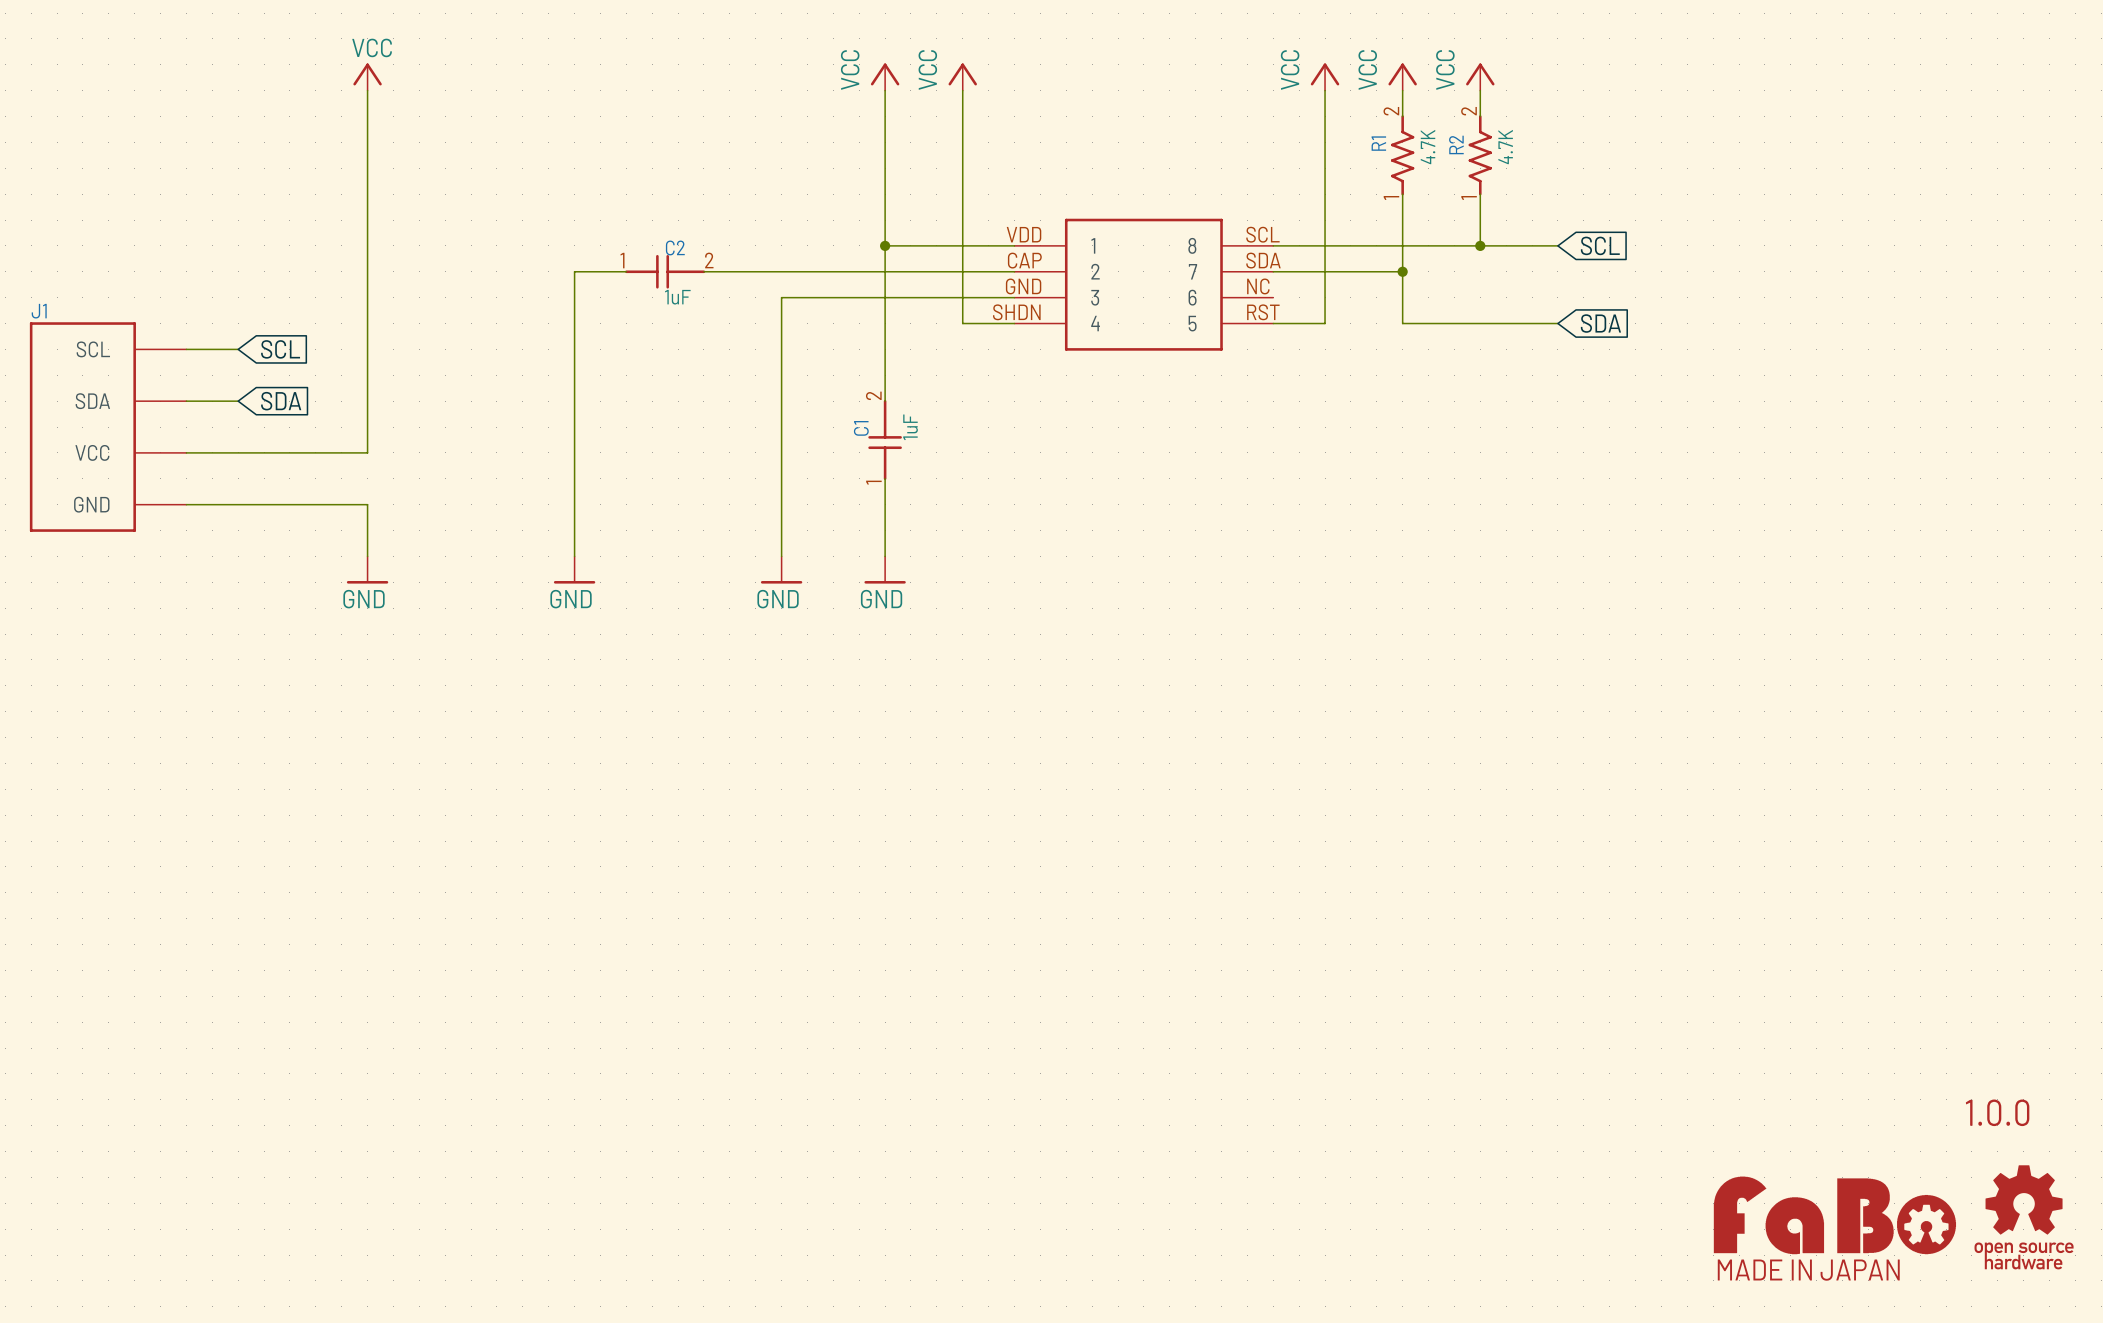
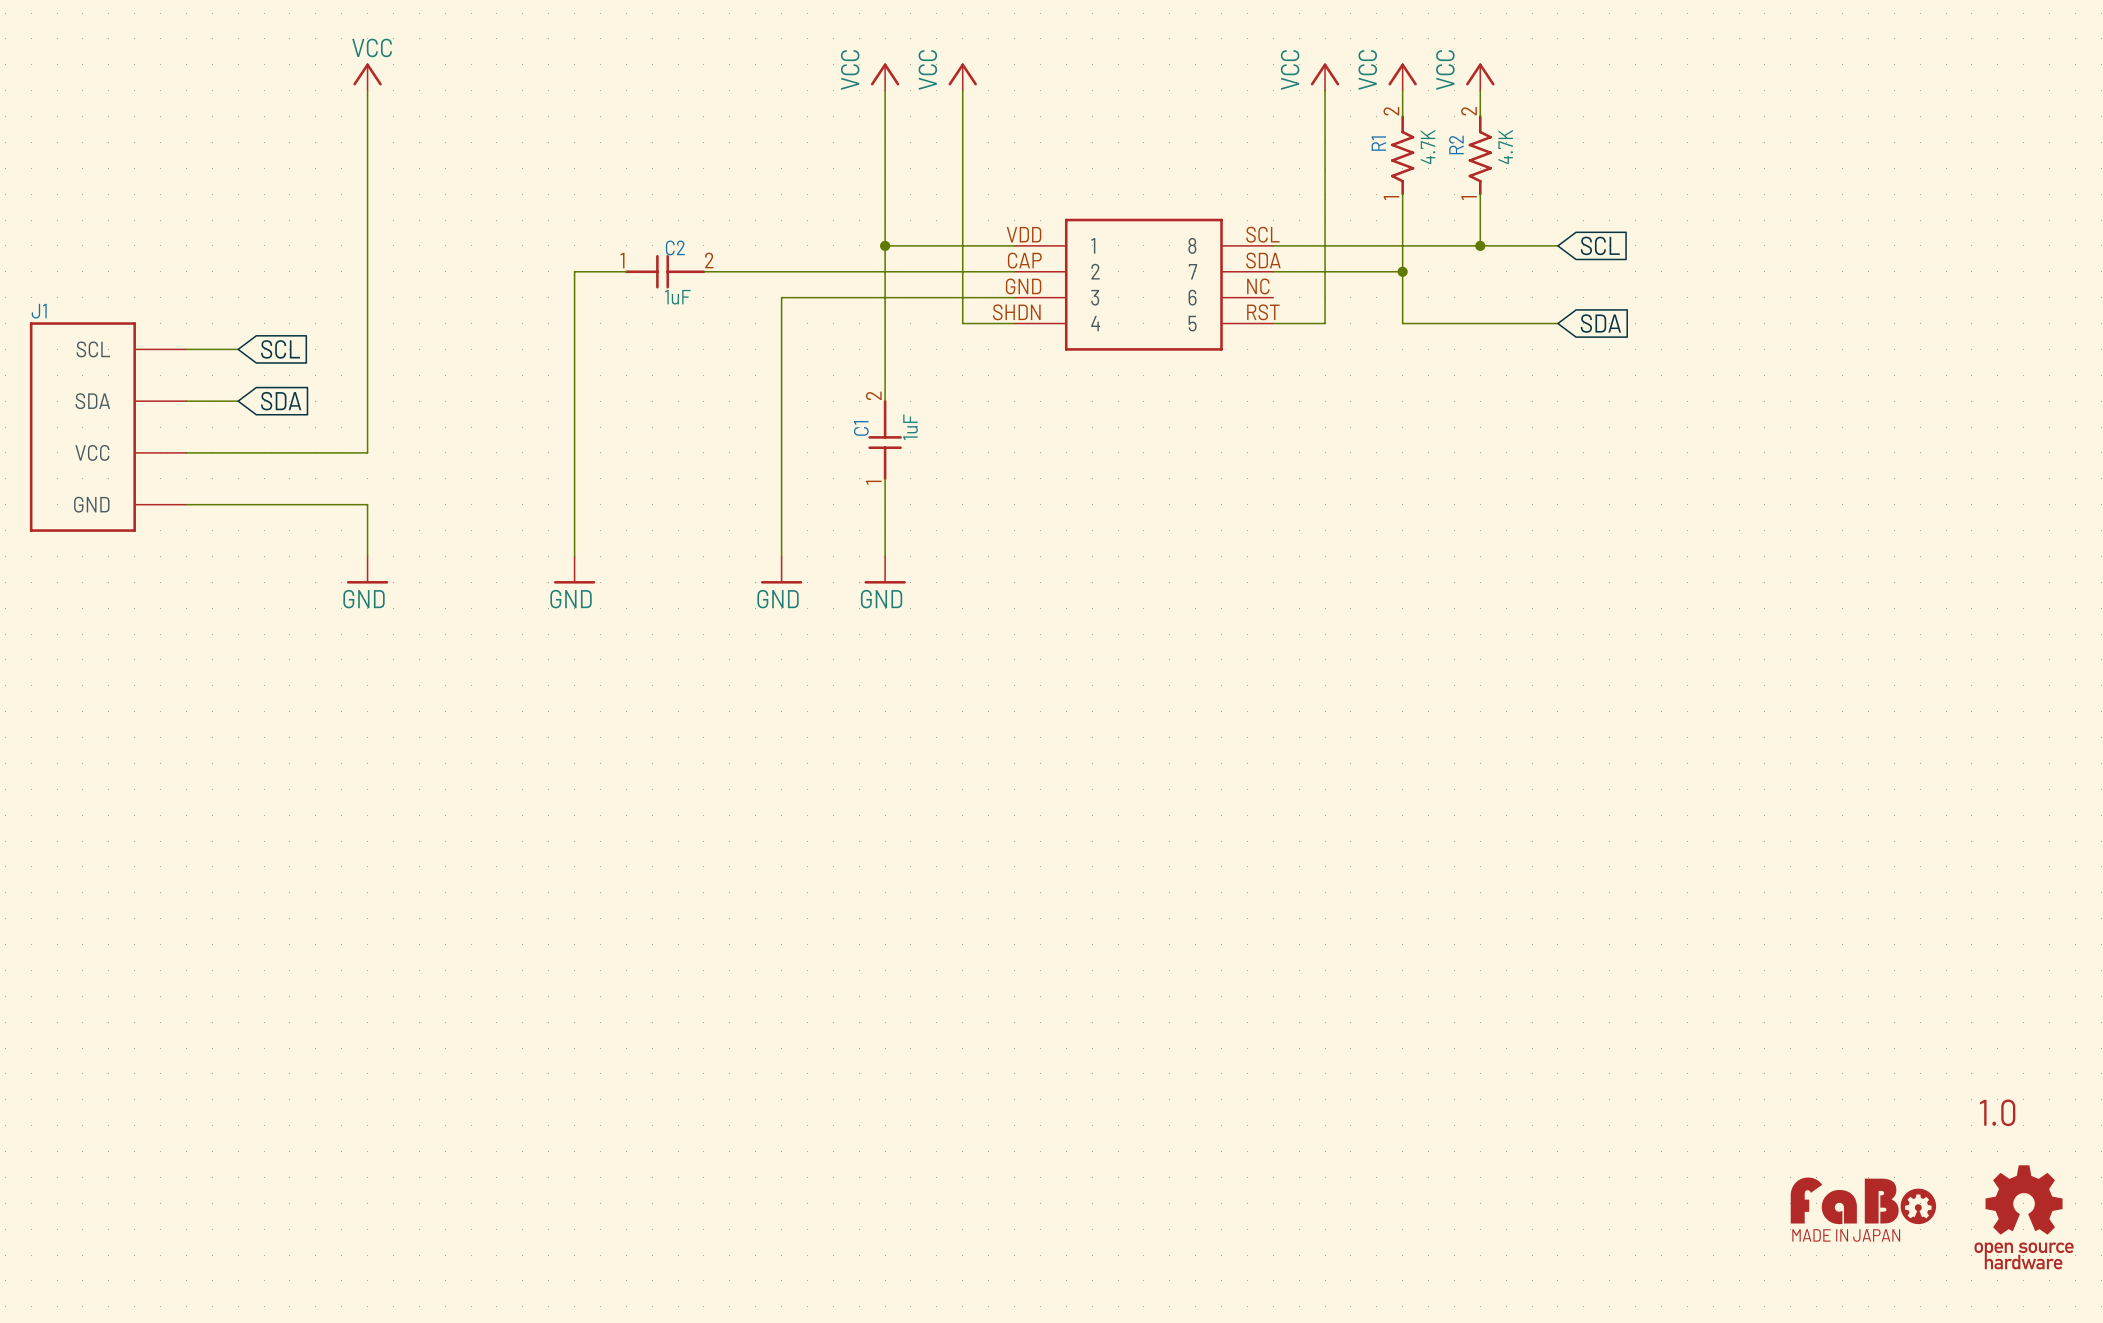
text: 1.0.0 (1997, 1112) -> 1.0 (1997, 1112)
part: none -> (1863, 1200)
part: (1834, 1215) -> none

